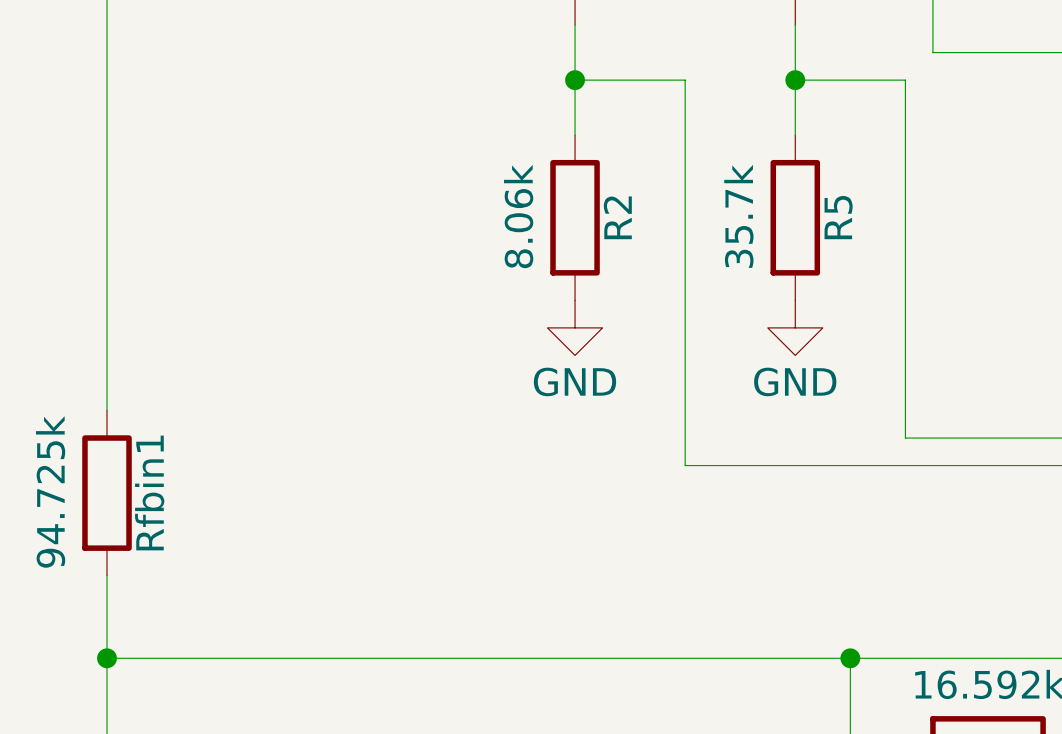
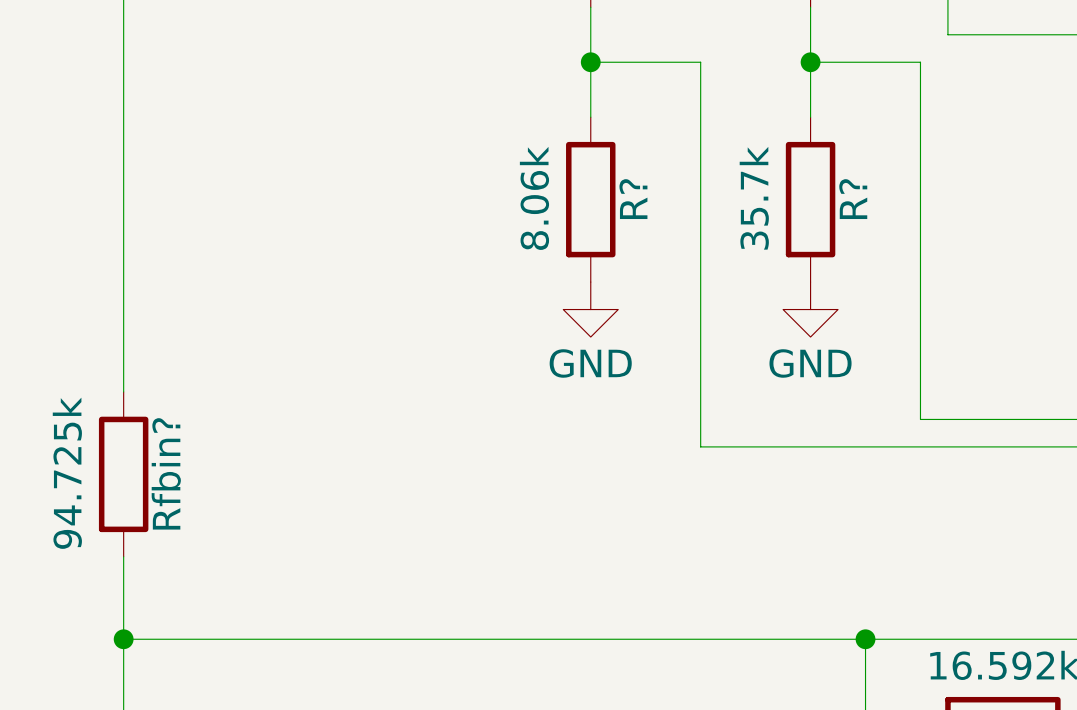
R2 name: R2 (617, 217) -> R? (633, 199)
R5 name: R5 (838, 217) -> R? (853, 199)
Rfbin1 name: Rfbin1 (149, 492) -> Rfbin? (166, 473)

